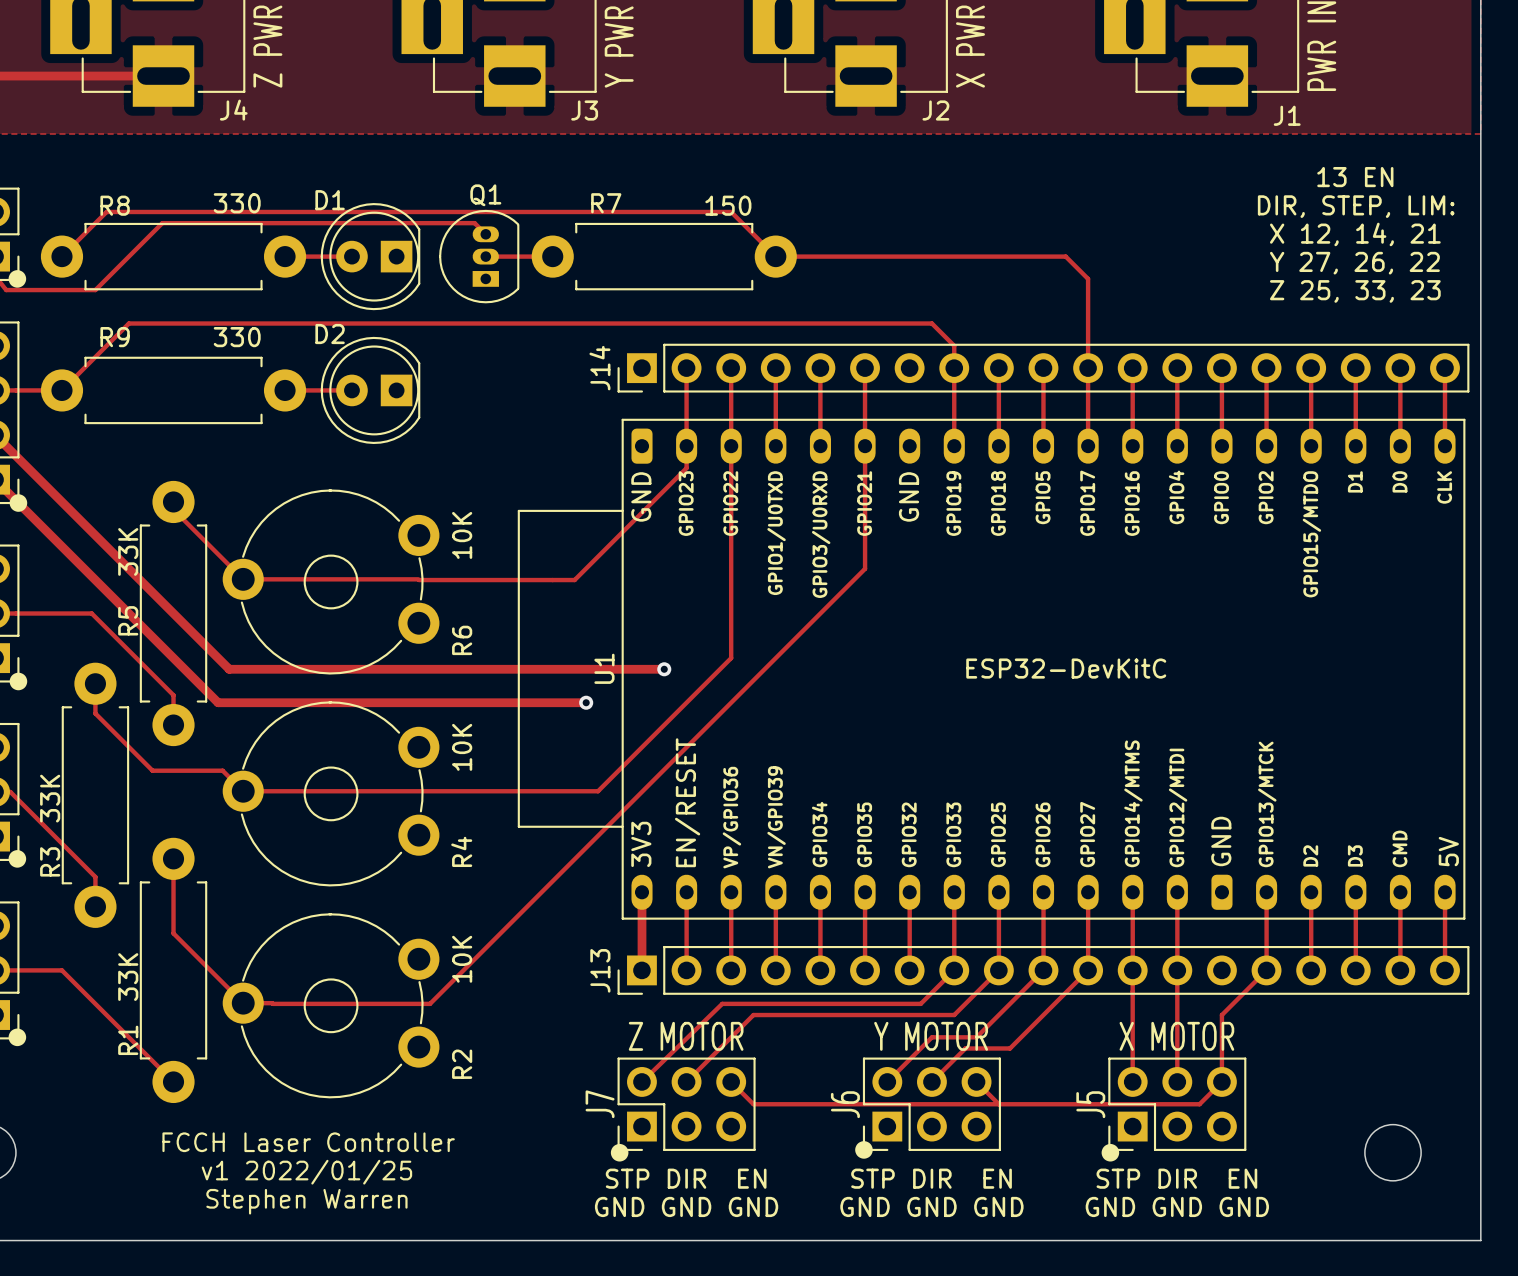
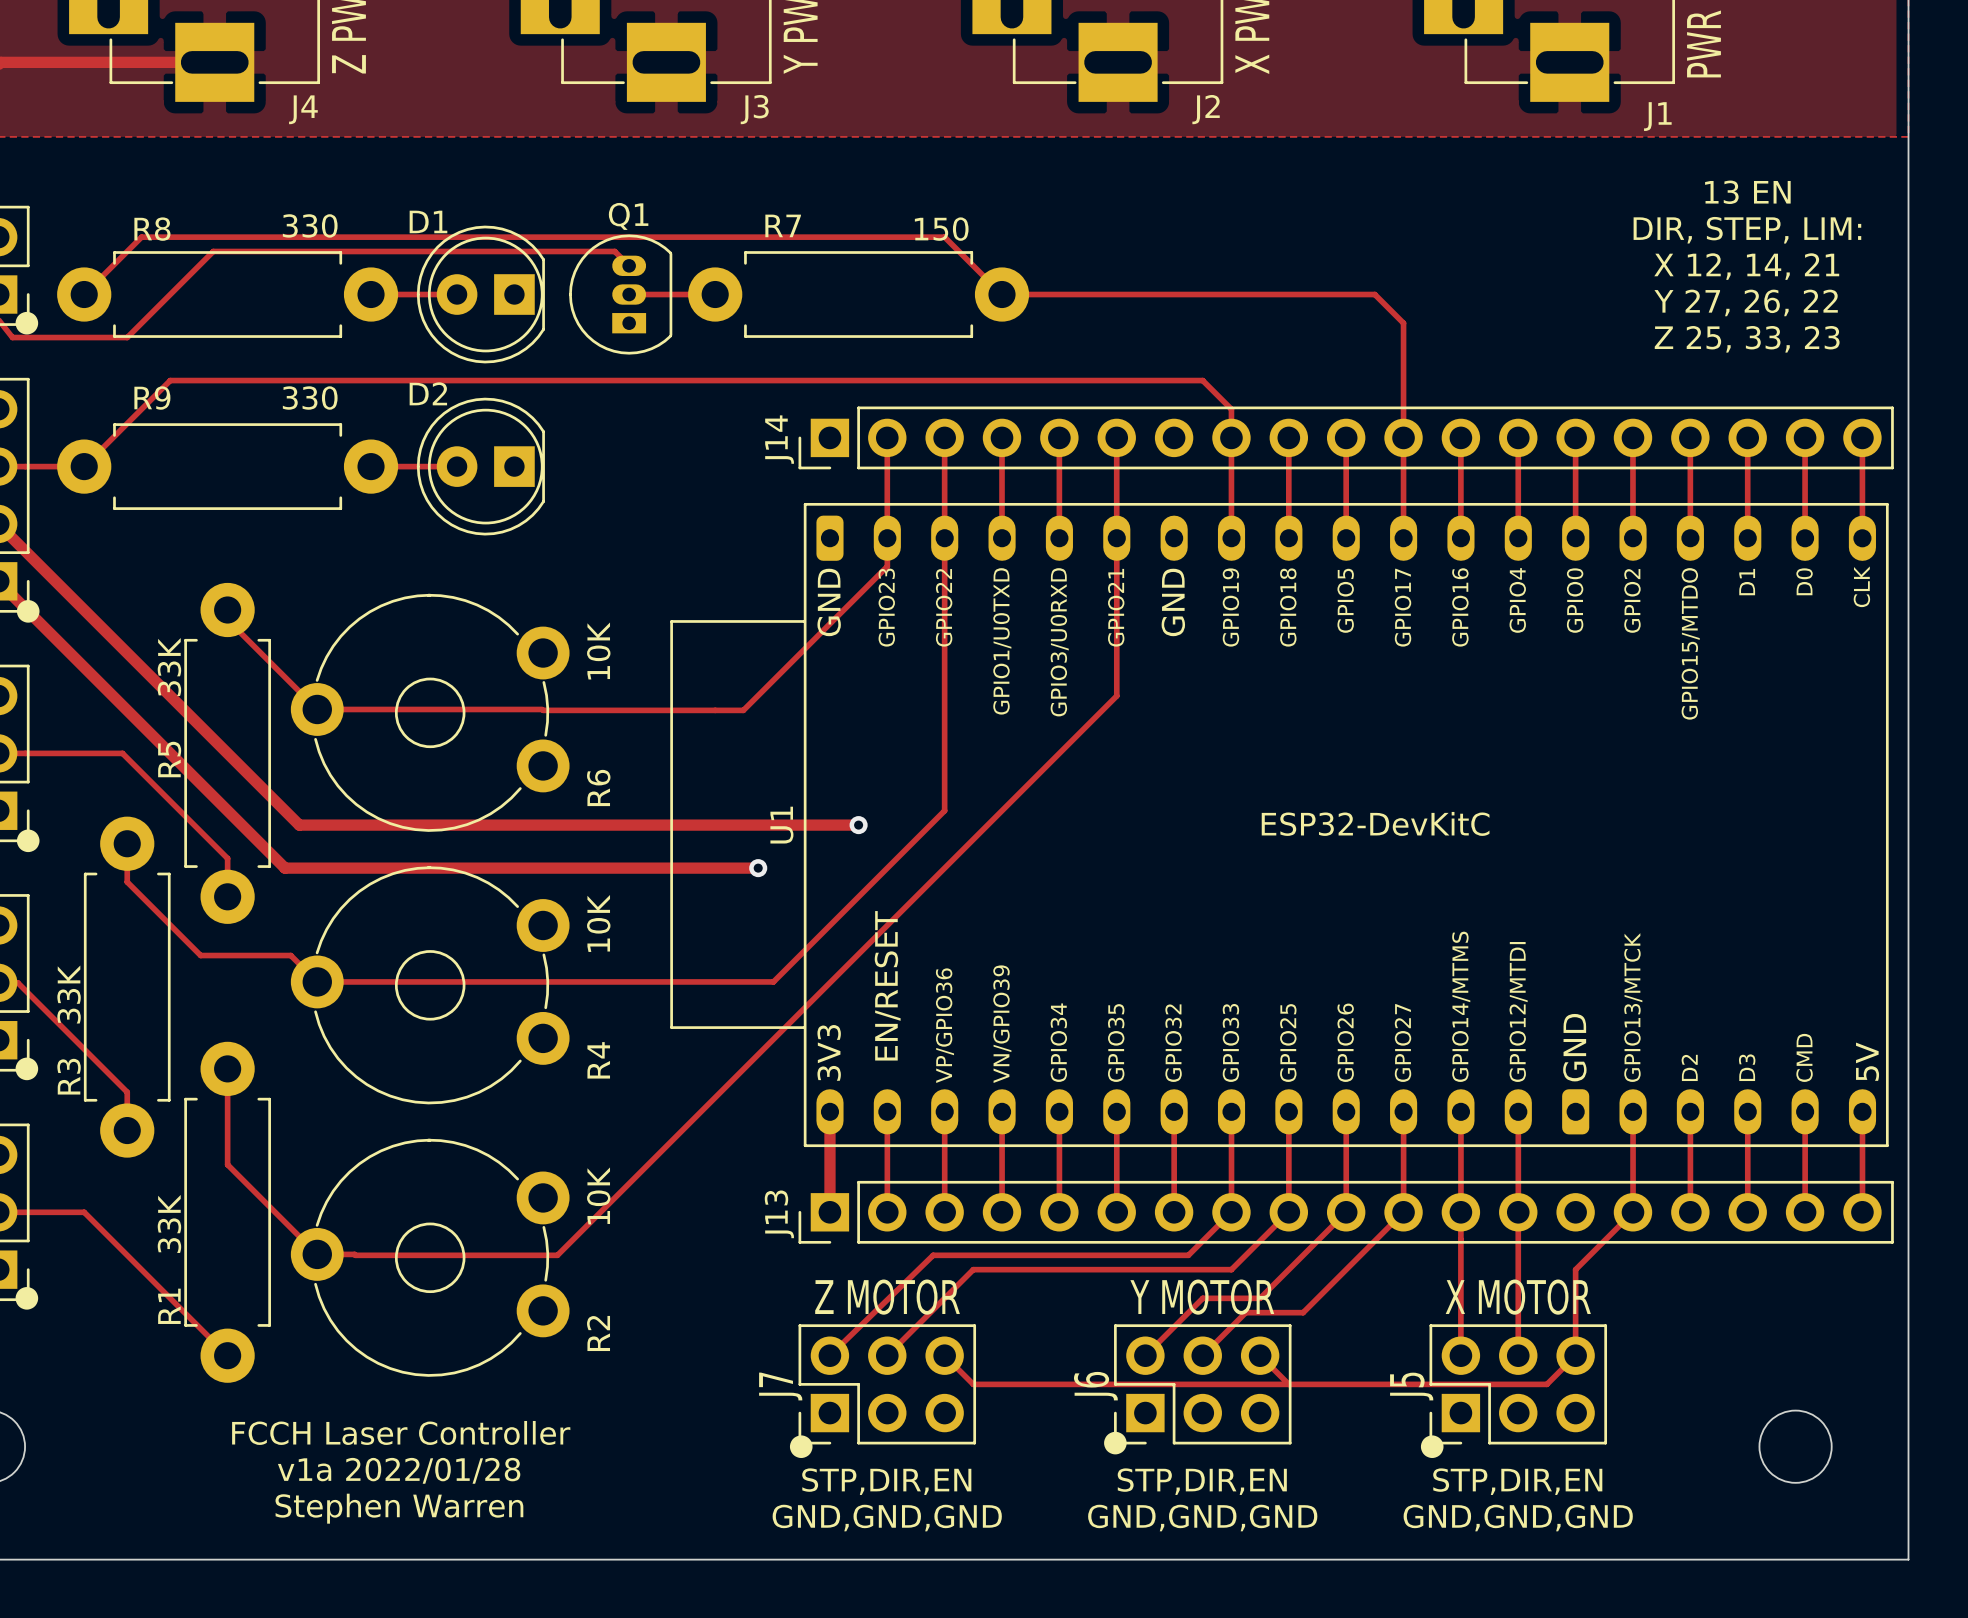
text: v1 2022/01/25 (306, 1172) -> v1a 2022/01/28 (399, 1470)
text: STP DIR EN (686, 1178) -> STP,DIR,EN (886, 1481)
text: STP DIR EN (931, 1178) -> STP,DIR,EN (1202, 1481)
text: STP DIR EN (1176, 1178) -> STP,DIR,EN (1517, 1481)
text: GND GND GND (686, 1206) -> GND,GND,GND (887, 1518)
text: GND GND GND (931, 1206) -> GND,GND,GND (1202, 1518)
text: GND GND GND (1177, 1206) -> GND,GND,GND (1518, 1518)

